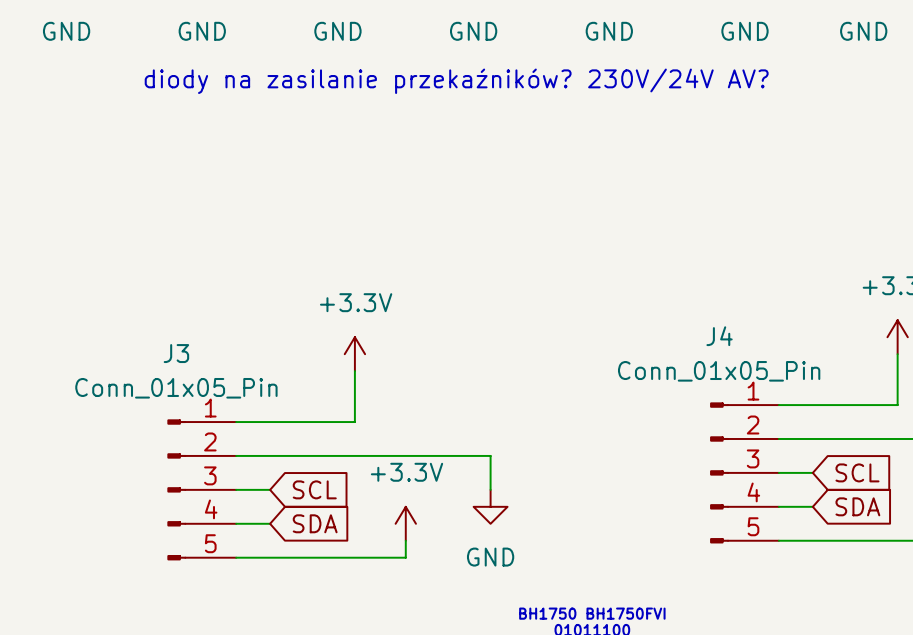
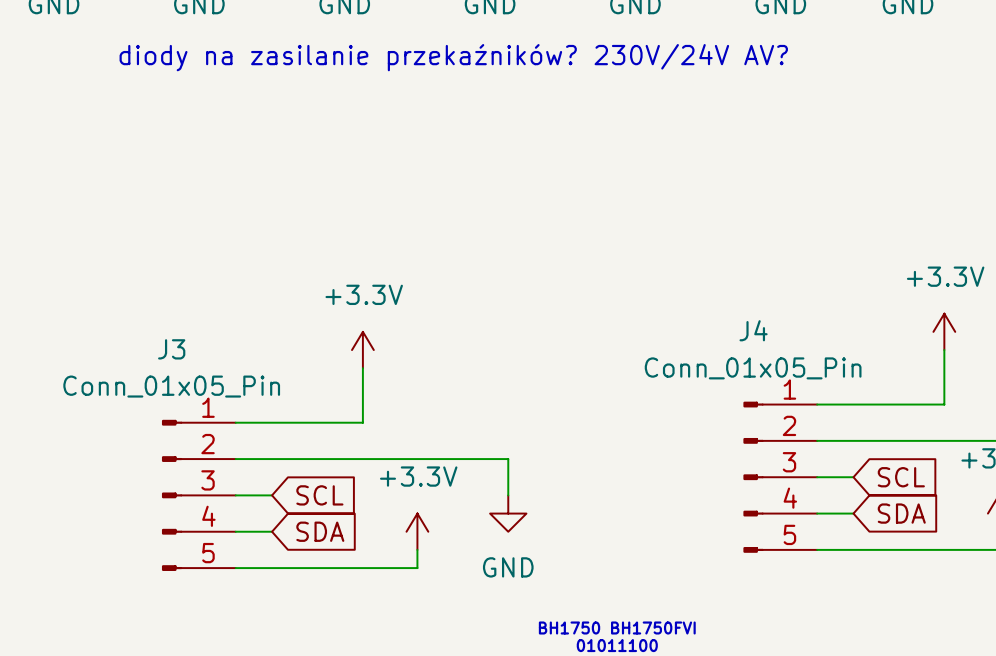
text position: diody na zasilanie przekaźników? 230V/24V AV? (456, 81) -> diody na zasilanie przekaźników? 230V/24V AV? (453, 57)

